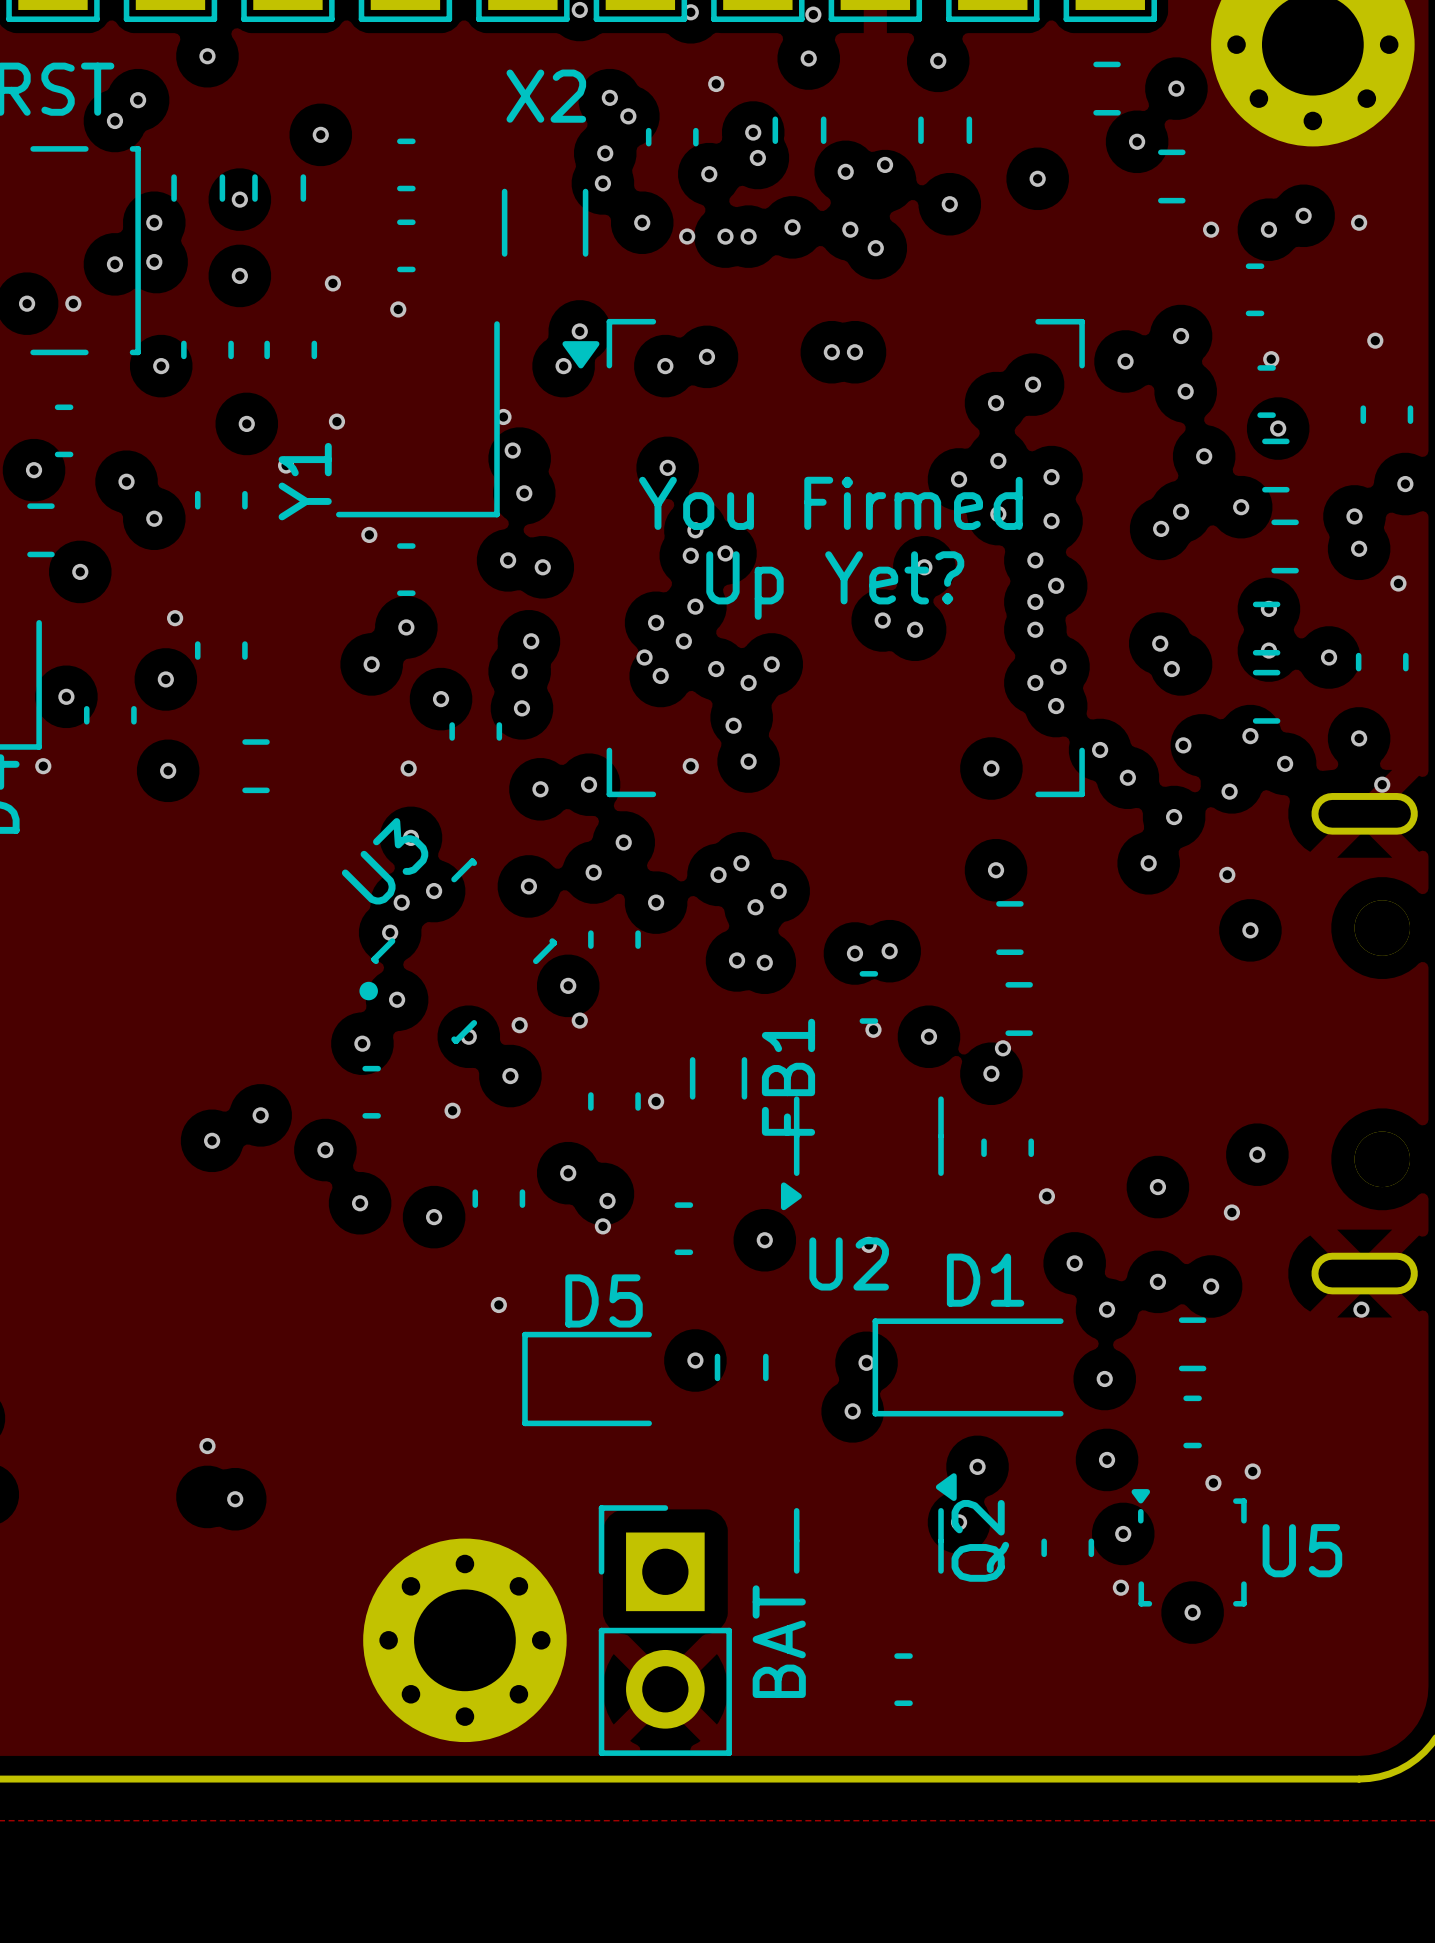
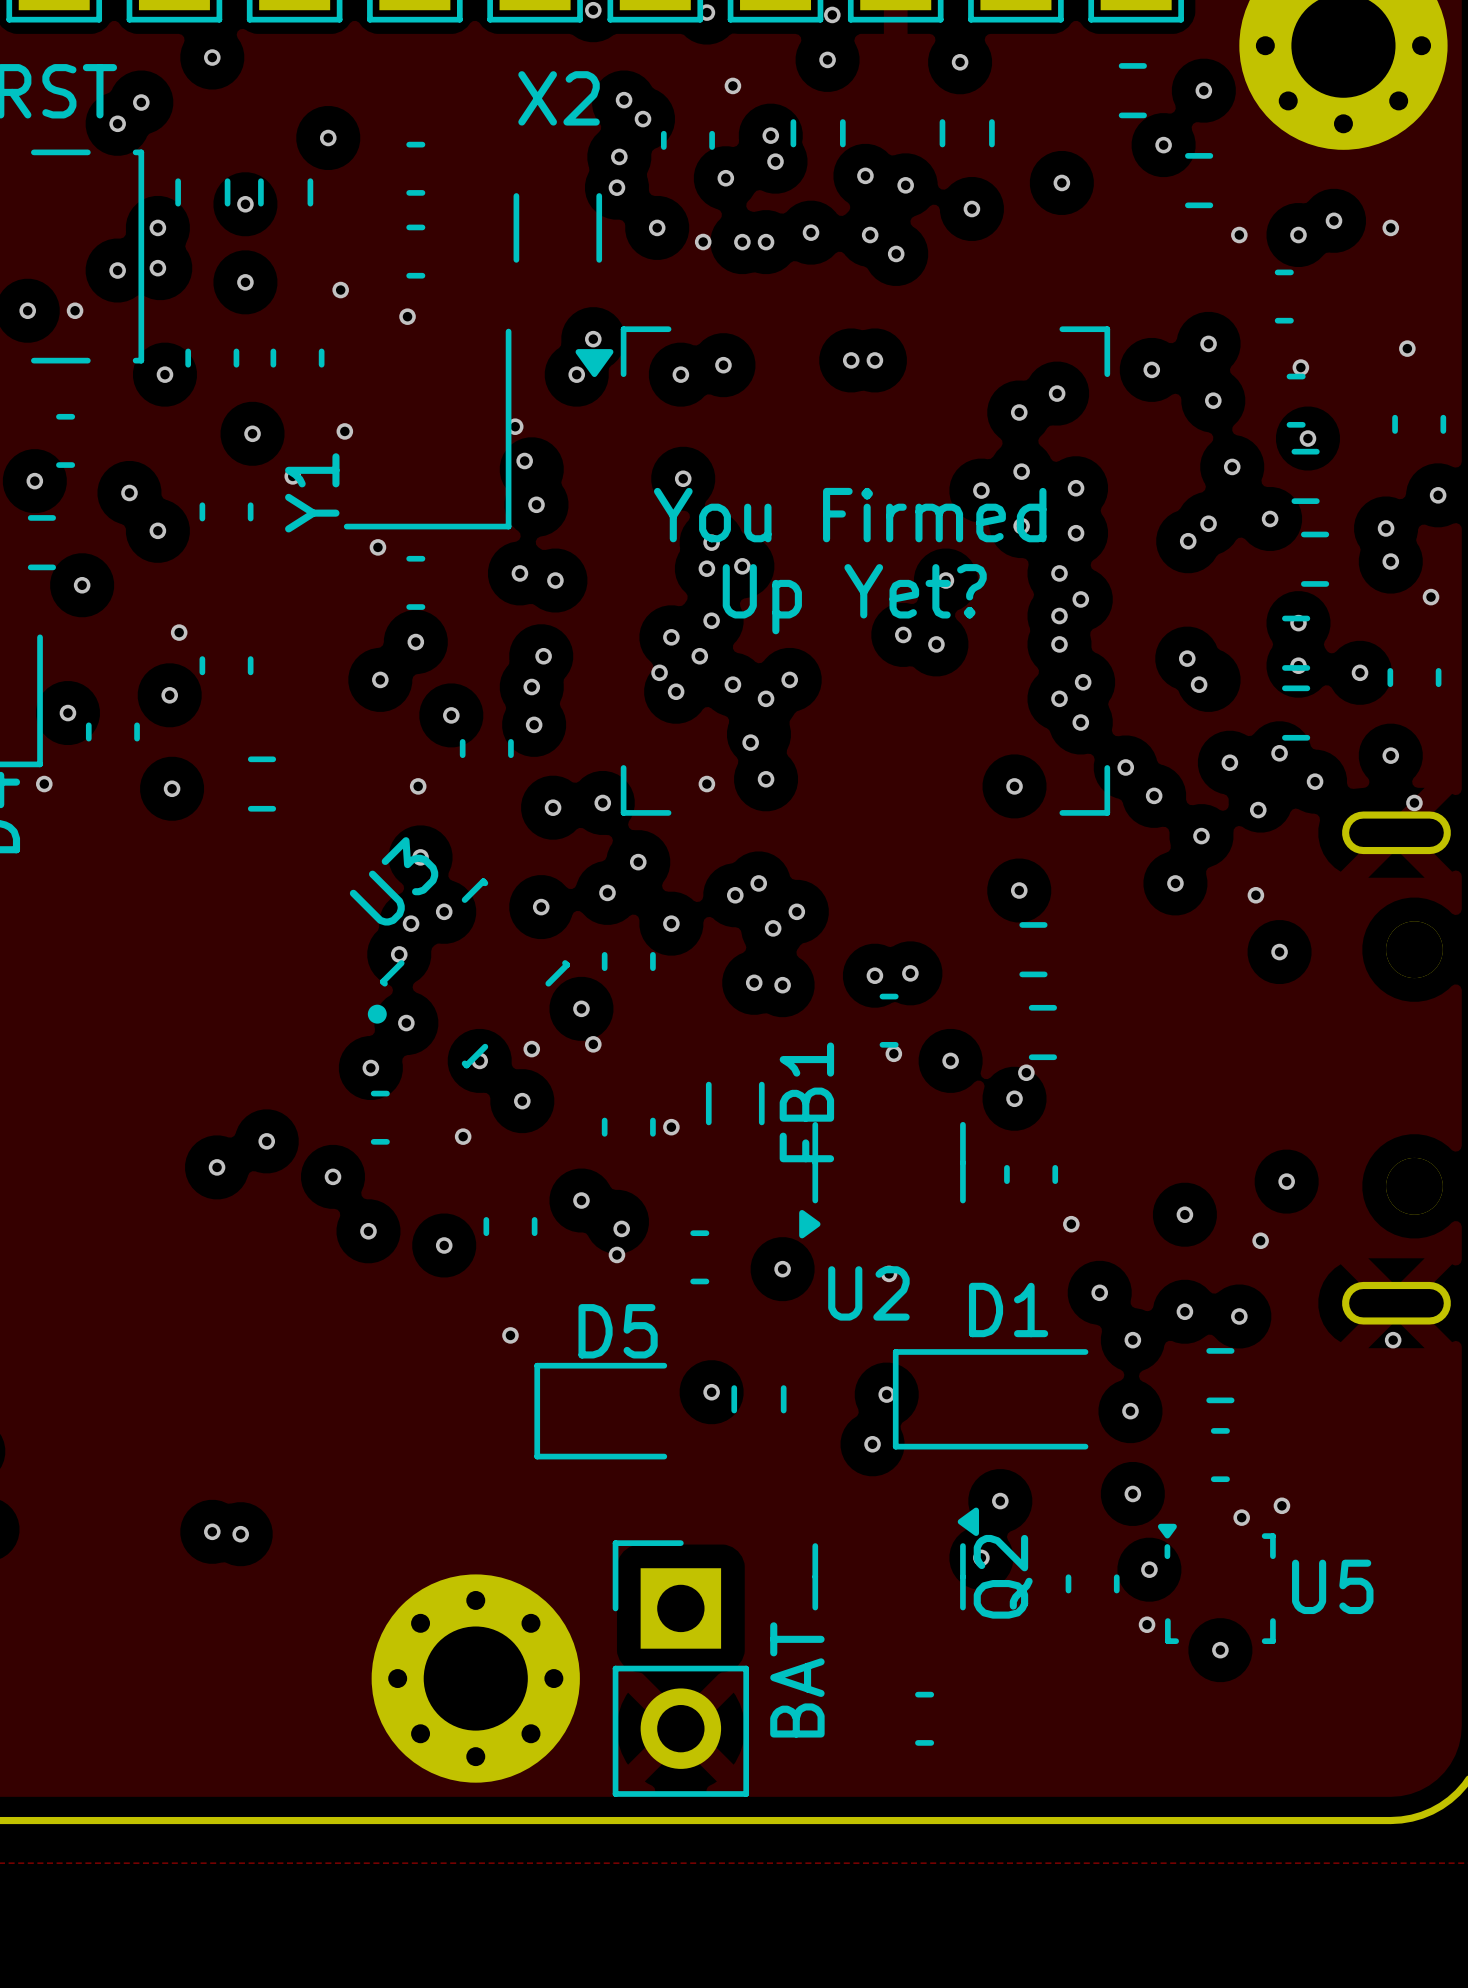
via position: (885, 164) -> (905, 185)
via position: (1183, 745) -> (1229, 762)
via position: (207, 1446) -> (212, 1531)

